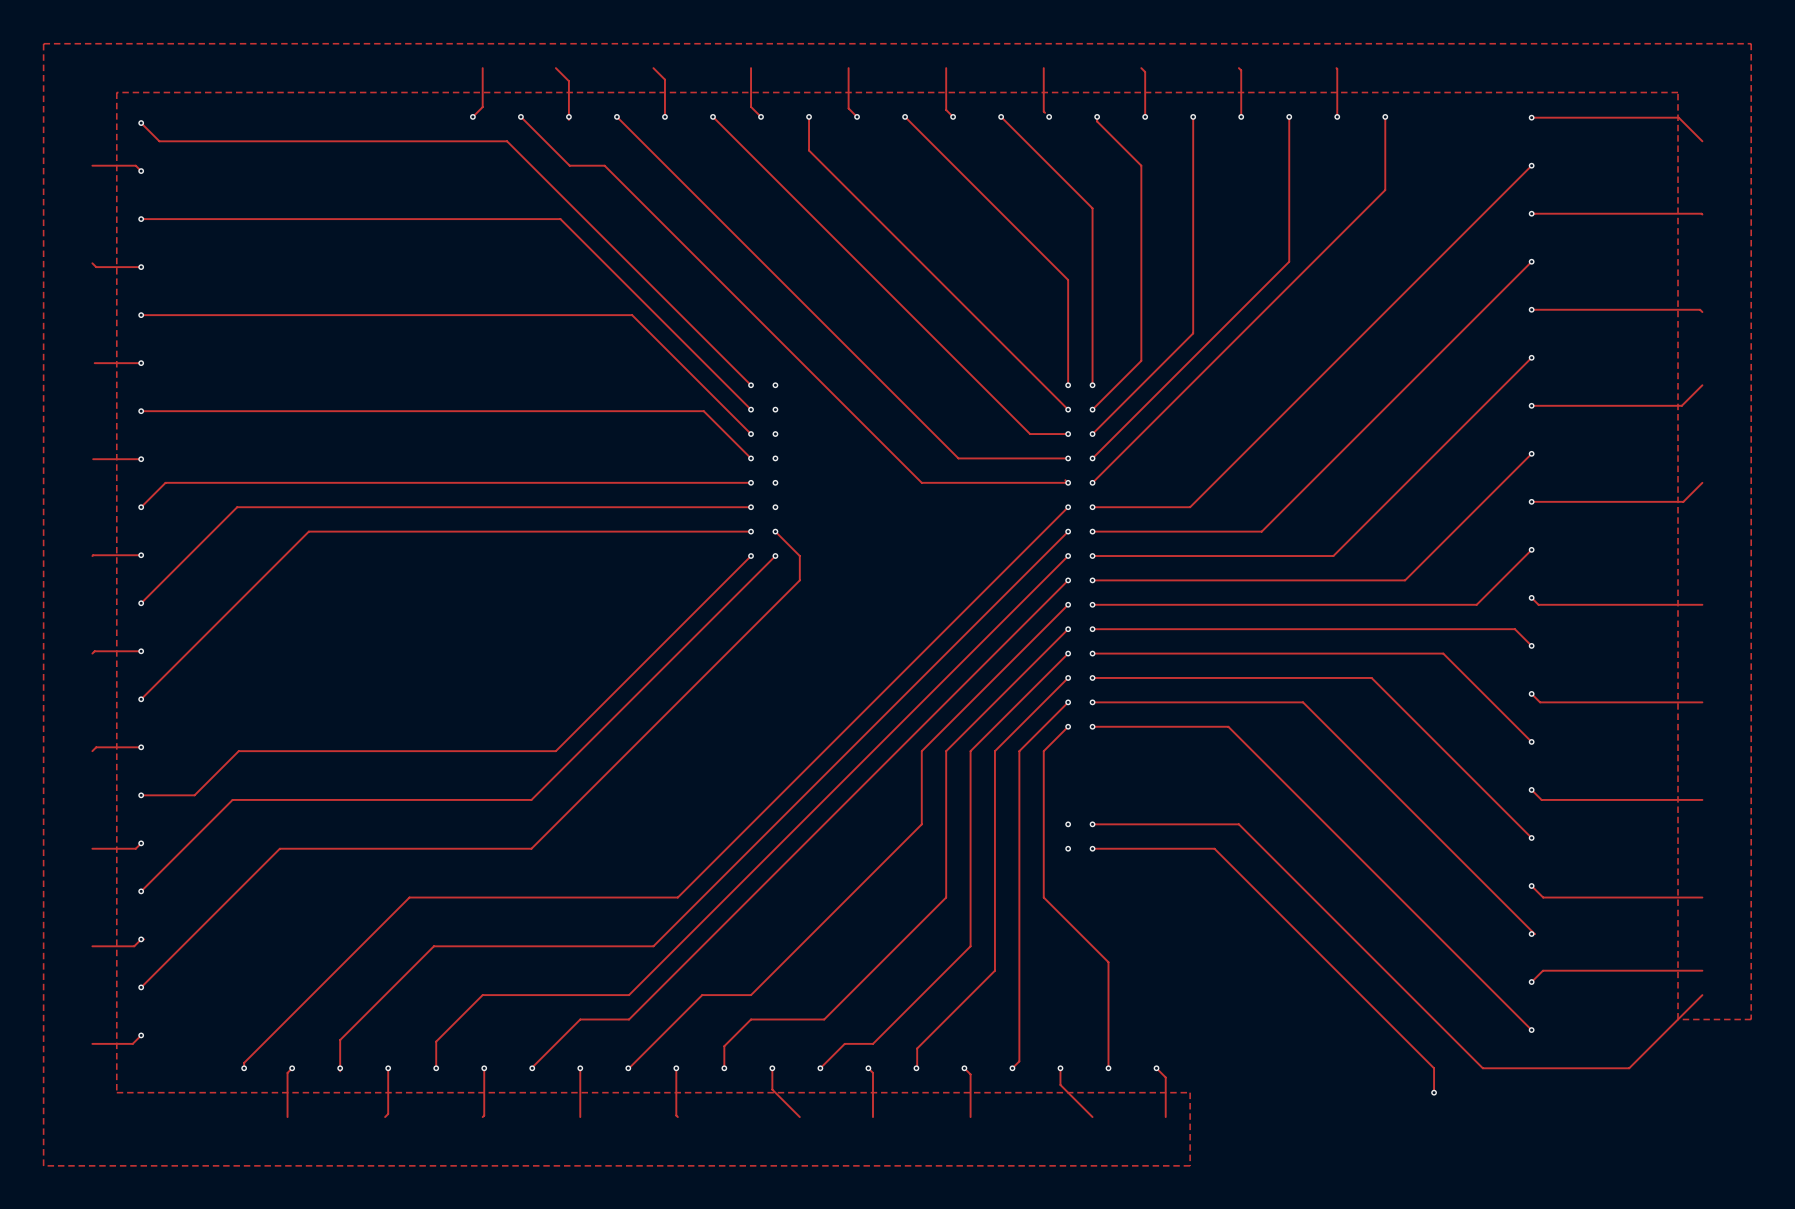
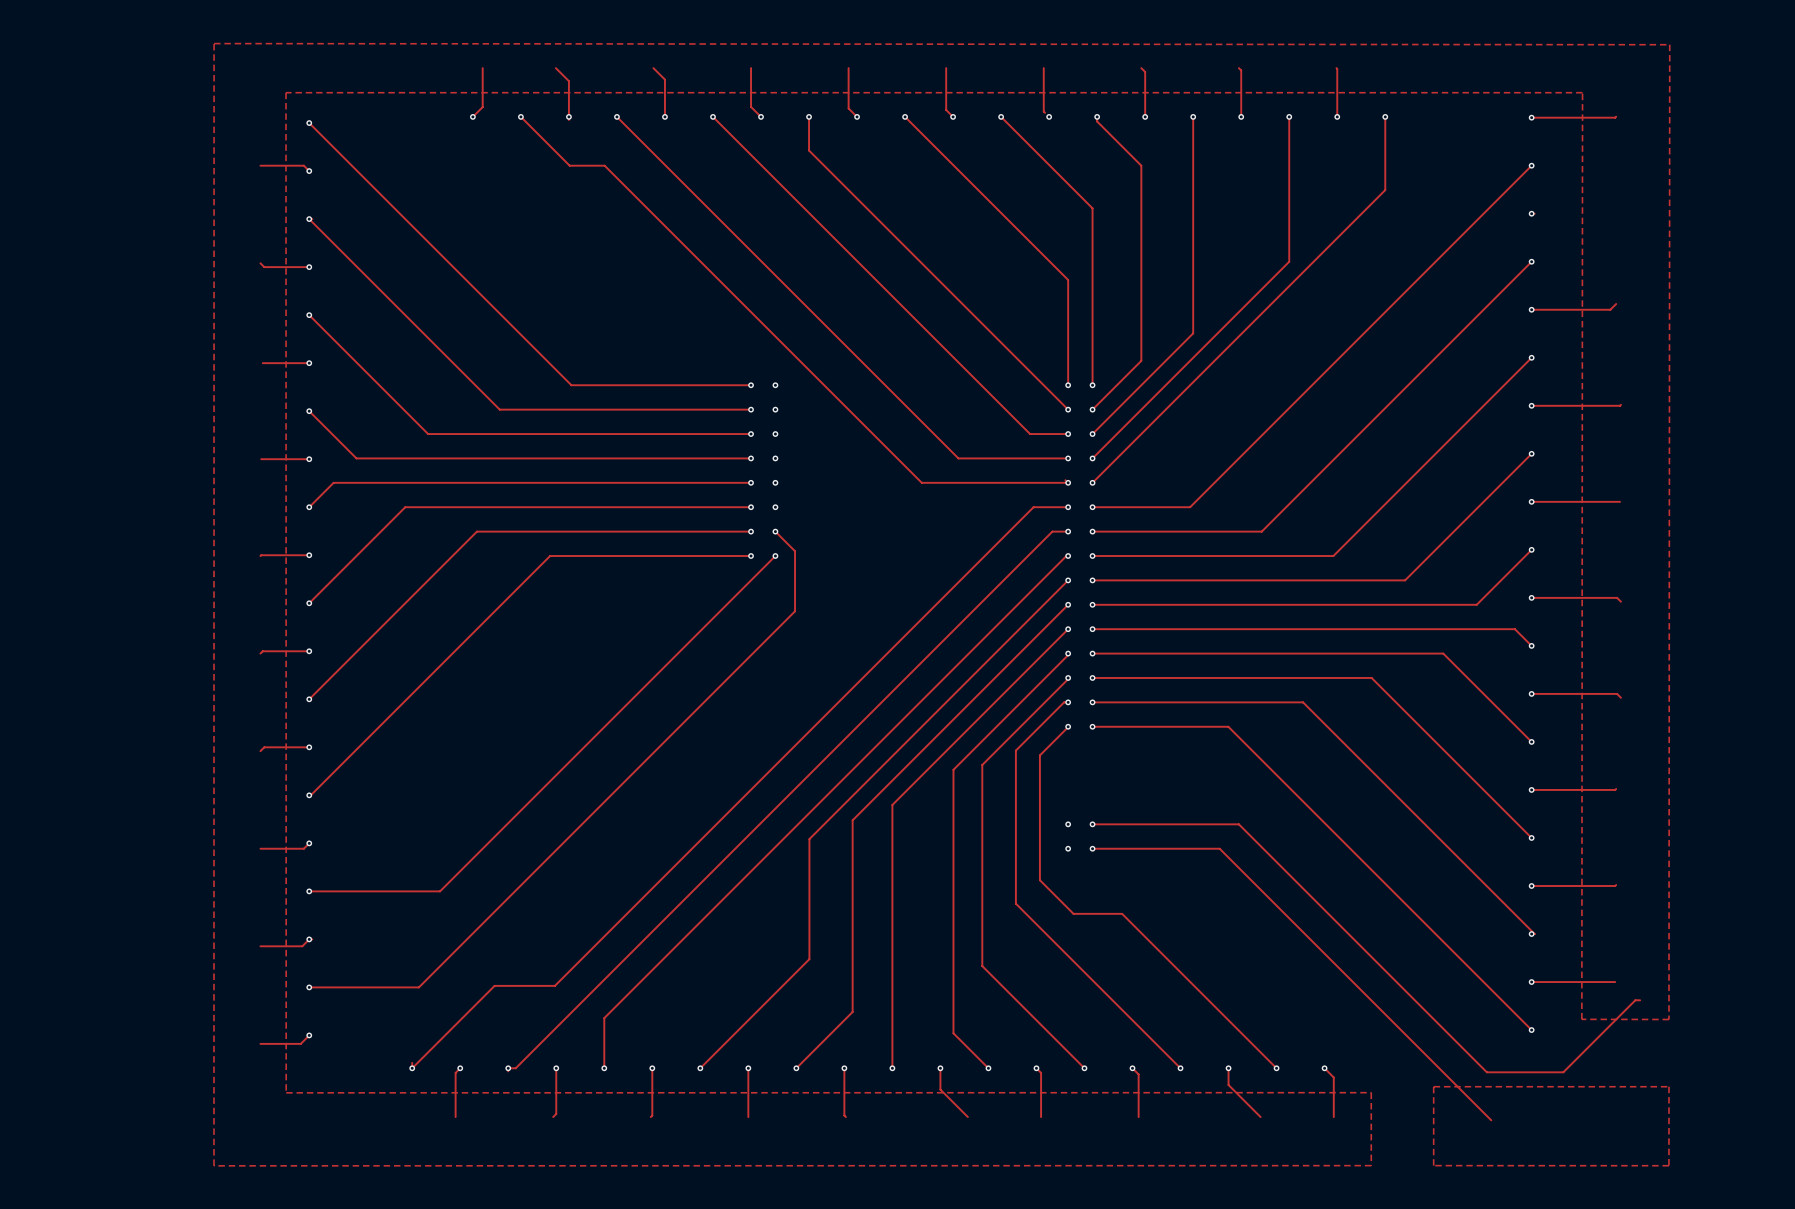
zone outline: (43, 43) (43, 1165) (1190, 1165) (1190, 1092) (116, 1092) (116, 92) (1678, 92) (1678, 1019) (1751, 1019) (1751, 43) (43, 43) -> (214, 43) (213, 1165) (1371, 1165) (1371, 1092) (286, 1092) (286, 92) (1582, 92) (1581, 1019) (1668, 1019) (1669, 44) (214, 43)
track: (1615, 117) (1678, 117) (1702, 141) -> (1615, 117) (1616, 116)
track: (141, 123) (159, 141) (507, 141) (751, 385) -> (309, 123) (571, 385) (751, 385)
via: (141, 123) -> none
via: none -> (309, 123)
track: (92, 165) (135, 165) (141, 171) -> (260, 165) (303, 165) (309, 171)
via: (141, 171) -> none
via: none -> (309, 171)
track: (1534, 213) (1702, 214) -> none
track: (141, 219) (309, 219) -> none
via: (141, 219) -> none
via: none -> (309, 219)
track: (312, 219) (560, 219) (751, 409) -> (309, 219) (499, 409) (751, 409)
track: (92, 263) (96, 267) (141, 267) -> (260, 263) (264, 267) (309, 267)
via: (141, 267) -> none
via: none -> (309, 267)
track: (1610, 309) (1700, 309) (1702, 312) -> (1610, 309) (1616, 304)
track: (141, 315) (632, 315) (751, 434) -> (309, 315) (428, 434) (751, 434)
via: (141, 315) -> none
via: none -> (309, 315)
track: (141, 362) (94, 363) -> (310, 362) (262, 363)
via: (141, 363) -> none
via: none -> (309, 363)
track: (1702, 385) (1681, 405) (1619, 405) -> (1620, 404) (1619, 405)
track: (141, 411) (703, 411) (751, 458) -> (309, 411) (356, 458) (751, 458)
via: (141, 411) -> none
via: none -> (309, 411)
track: (93, 459) (141, 459) -> (261, 459) (309, 459)
via: (141, 459) -> none
via: none -> (309, 459)
track: (333, 482) (165, 482) (141, 507) -> (333, 482) (309, 507)
track: (1702, 482) (1683, 501) (1619, 501) -> none
via: (141, 507) -> none
via: none -> (309, 507)
track: (405, 507) (237, 507) (141, 603) -> (405, 507) (309, 603)
track: (1068, 507) (677, 897) (409, 897) (244, 1062) (244, 1068) -> (1068, 507) (1033, 507) (554, 985) (494, 985) (412, 1068) (412, 1062)
track: (476, 531) (308, 531) (141, 699) -> (476, 531) (309, 699)
track: (1068, 531) (653, 946) (433, 946) (340, 1040) (340, 1071) -> (1068, 531) (1052, 531) (515, 1068) (508, 1068) (508, 1071)
track: (795, 551) (799, 556) (799, 580) (531, 848) (303, 848) -> (795, 551) (795, 611) (418, 987) (309, 987)
track: (141, 555) (92, 556) -> (309, 555) (260, 556)
via: (141, 555) -> none
via: none -> (309, 555)
track: (751, 556) (555, 751) (238, 751) (194, 795) (141, 796) -> (751, 556) (550, 556) (309, 795)
track: (1068, 556) (629, 995) (482, 995) (436, 1041) (436, 1068) -> (1068, 556) (604, 1018) (604, 1068)
track: (1531, 597) (1538, 604) (1702, 604) -> (1531, 597) (1617, 597) (1620, 601)
via: (141, 603) -> none
via: none -> (309, 603)
track: (141, 651) (94, 651) (92, 653) -> (309, 651) (262, 651) (260, 653)
via: (141, 651) -> none
via: none -> (309, 651)
track: (1068, 653) (970, 751) (970, 946) (873, 1043) (844, 1043) (820, 1068) -> (1068, 653) (953, 769) (953, 1033) (988, 1068)
track: (1068, 677) (994, 751) (994, 970) (917, 1048) (916, 1068) -> (1068, 677) (982, 764) (982, 966) (1085, 1069)
track: (1531, 693) (1540, 702) (1702, 702) -> (1531, 693) (1617, 693) (1620, 697)
via: (141, 699) -> none
via: none -> (309, 699)
track: (1068, 702) (1019, 751) (1019, 1061) (1012, 1068) -> (1068, 702) (1064, 702) (1015, 750) (1015, 903) (1180, 1068)
track: (1068, 726) (1043, 751) (1043, 897) (1108, 962) (1108, 1068) -> (1068, 726) (1039, 755) (1039, 880) (1073, 913) (1122, 913) (1276, 1068)
track: (141, 747) (96, 747) (92, 751) -> (309, 747) (264, 747) (260, 751)
via: (141, 747) -> none
via: none -> (309, 747)
track: (921, 751) (921, 824) (751, 995) (702, 995) (628, 1068) -> (921, 751) (852, 820) (852, 1012) (797, 1068)
track: (946, 751) (946, 897) (824, 1019) (751, 1019) (724, 1046) (724, 1068) -> (946, 751) (892, 804) (892, 1068)
track: none -> (1616, 789) (1531, 789)
track: (1532, 790) (1541, 799) (1702, 799) -> none
via: (141, 795) -> none
via: none -> (309, 795)
track: (531, 799) (232, 799) (141, 891) -> (531, 799) (440, 891) (309, 891)
track: (809, 839) (629, 1019) (580, 1019) (532, 1068) -> (809, 839) (809, 959) (700, 1067)
track: (141, 843) (135, 848) (92, 848) -> none
via: (141, 843) -> none
track: none -> (309, 843) (303, 848)
via: none -> (309, 843)
track: (279, 848) (141, 987) -> (279, 848) (260, 848)
track: (1214, 848) (1434, 1068) (1434, 1092) -> (1214, 848) (1219, 848) (1491, 1120)
track: (1531, 886) (1543, 897) (1702, 897) -> (1531, 886) (1616, 885)
via: (141, 891) -> none
via: none -> (309, 891)
via: (141, 939) -> none
track: (144, 939) (141, 939) (134, 946) (92, 946) -> (312, 939) (309, 939) (302, 946) (260, 946)
via: none -> (309, 939)
track: (1702, 970) (1542, 970) (1531, 982) -> (1615, 982) (1531, 982)
via: (141, 987) -> none
via: none -> (309, 987)
track: (1702, 995) (1629, 1068) (1482, 1068) -> (1640, 1000) (1635, 1000) (1563, 1072) (1486, 1072) (1482, 1068)
track: (141, 1035) (132, 1043) (92, 1043) -> (309, 1035) (300, 1043) (260, 1043)
via: (141, 1035) -> none
via: none -> (309, 1035)
via: (244, 1068) -> none
track: (292, 1068) (287, 1072) (287, 1117) -> (460, 1068) (455, 1072) (455, 1117)
via: (292, 1068) -> none
via: (340, 1068) -> none
track: (388, 1068) (388, 1113) (385, 1117) -> (556, 1068) (556, 1113) (553, 1117)
via: (388, 1068) -> none
via: none -> (412, 1068)
via: (436, 1068) -> none
via: none -> (460, 1068)
via: (484, 1068) -> none
via: none -> (508, 1068)
via: (532, 1068) -> none
via: none -> (556, 1068)
track: (580, 1068) (580, 1117) -> (748, 1068) (748, 1117)
via: (580, 1068) -> none
via: none -> (604, 1068)
via: (628, 1068) -> none
via: none -> (652, 1068)
track: (676, 1068) (677, 1117) -> (844, 1068) (845, 1117)
via: (676, 1068) -> none
via: none -> (700, 1068)
via: (724, 1068) -> none
via: none -> (748, 1068)
track: (772, 1068) (772, 1089) (799, 1117) -> (940, 1068) (940, 1089) (967, 1117)
via: (772, 1068) -> none
via: none -> (796, 1068)
via: (820, 1068) -> none
via: none -> (844, 1068)
track: (868, 1068) (873, 1072) (873, 1117) -> (1036, 1068) (1041, 1072) (1041, 1117)
via: (868, 1068) -> none
via: none -> (892, 1068)
via: (916, 1068) -> none
via: none -> (940, 1068)
track: (964, 1068) (970, 1074) (970, 1117) -> (1132, 1068) (1138, 1074) (1138, 1117)
via: (964, 1068) -> none
via: none -> (988, 1068)
via: (1012, 1068) -> none
via: none -> (1036, 1068)
track: (1060, 1068) (1060, 1084) (1092, 1117) -> (1228, 1068) (1228, 1084) (1260, 1117)
via: (1060, 1068) -> none
via: none -> (1084, 1068)
via: (1108, 1068) -> none
via: none -> (1132, 1068)
track: (1156, 1068) (1165, 1077) (1165, 1117) -> (1324, 1068) (1333, 1077) (1333, 1117)
via: (1156, 1068) -> none
via: none -> (1180, 1068)
via: none -> (1228, 1068)
via: none -> (1276, 1068)
via: none -> (1324, 1068)
track: (483, 1069) (484, 1115) (482, 1117) -> (651, 1069) (652, 1115) (650, 1117)
zone outline: none -> (1433, 1086) (1433, 1165) (1668, 1165) (1668, 1086) (1433, 1086)
via: (1434, 1092) -> none

